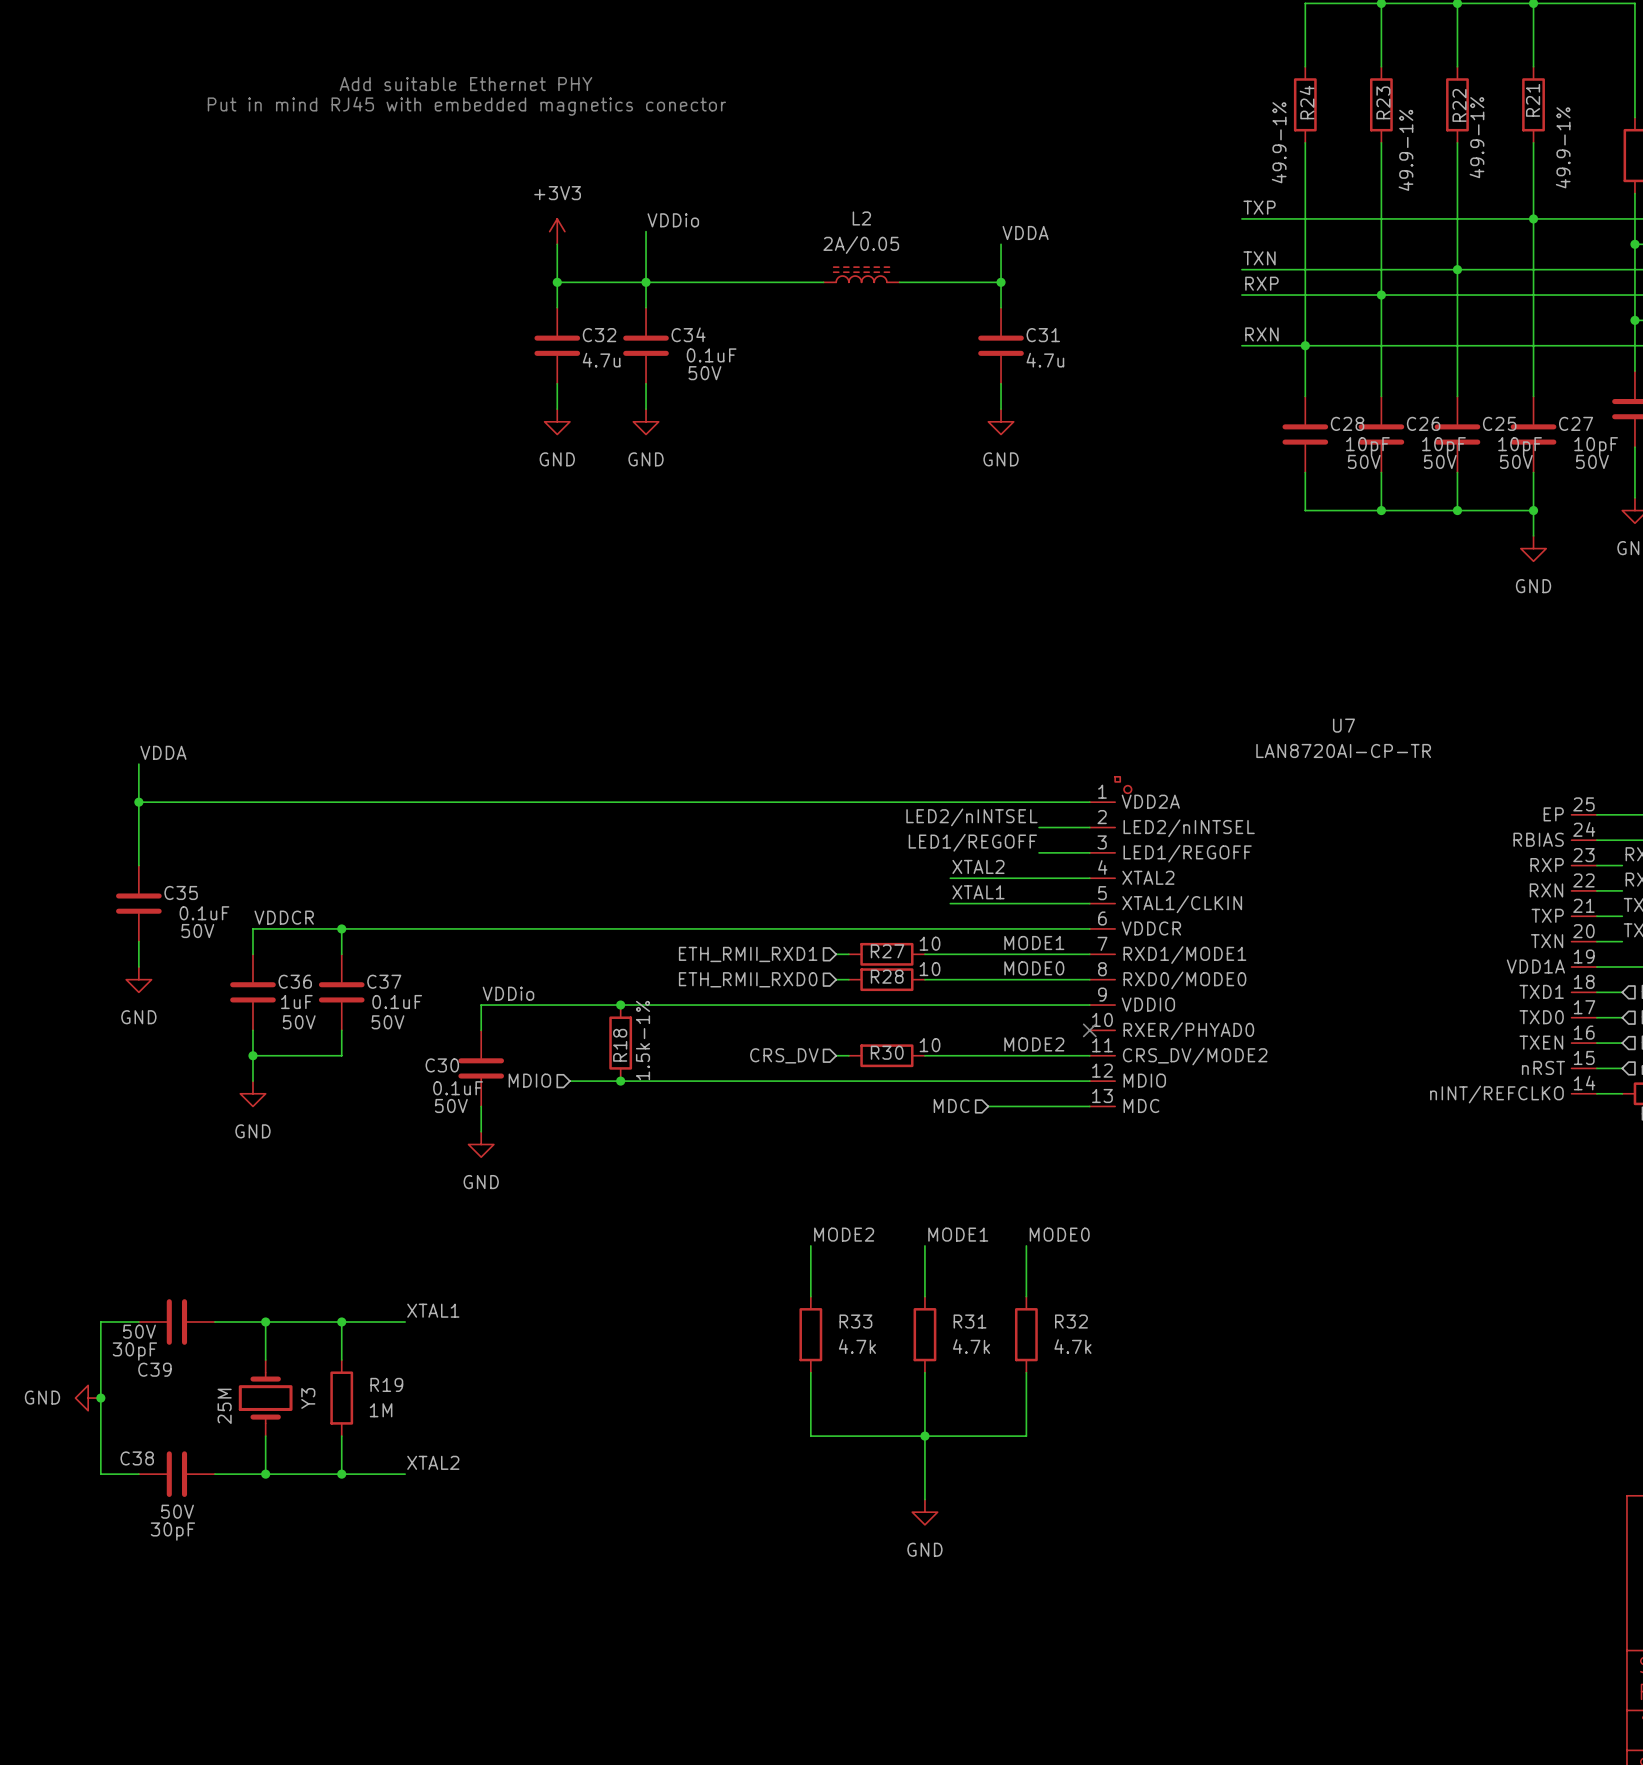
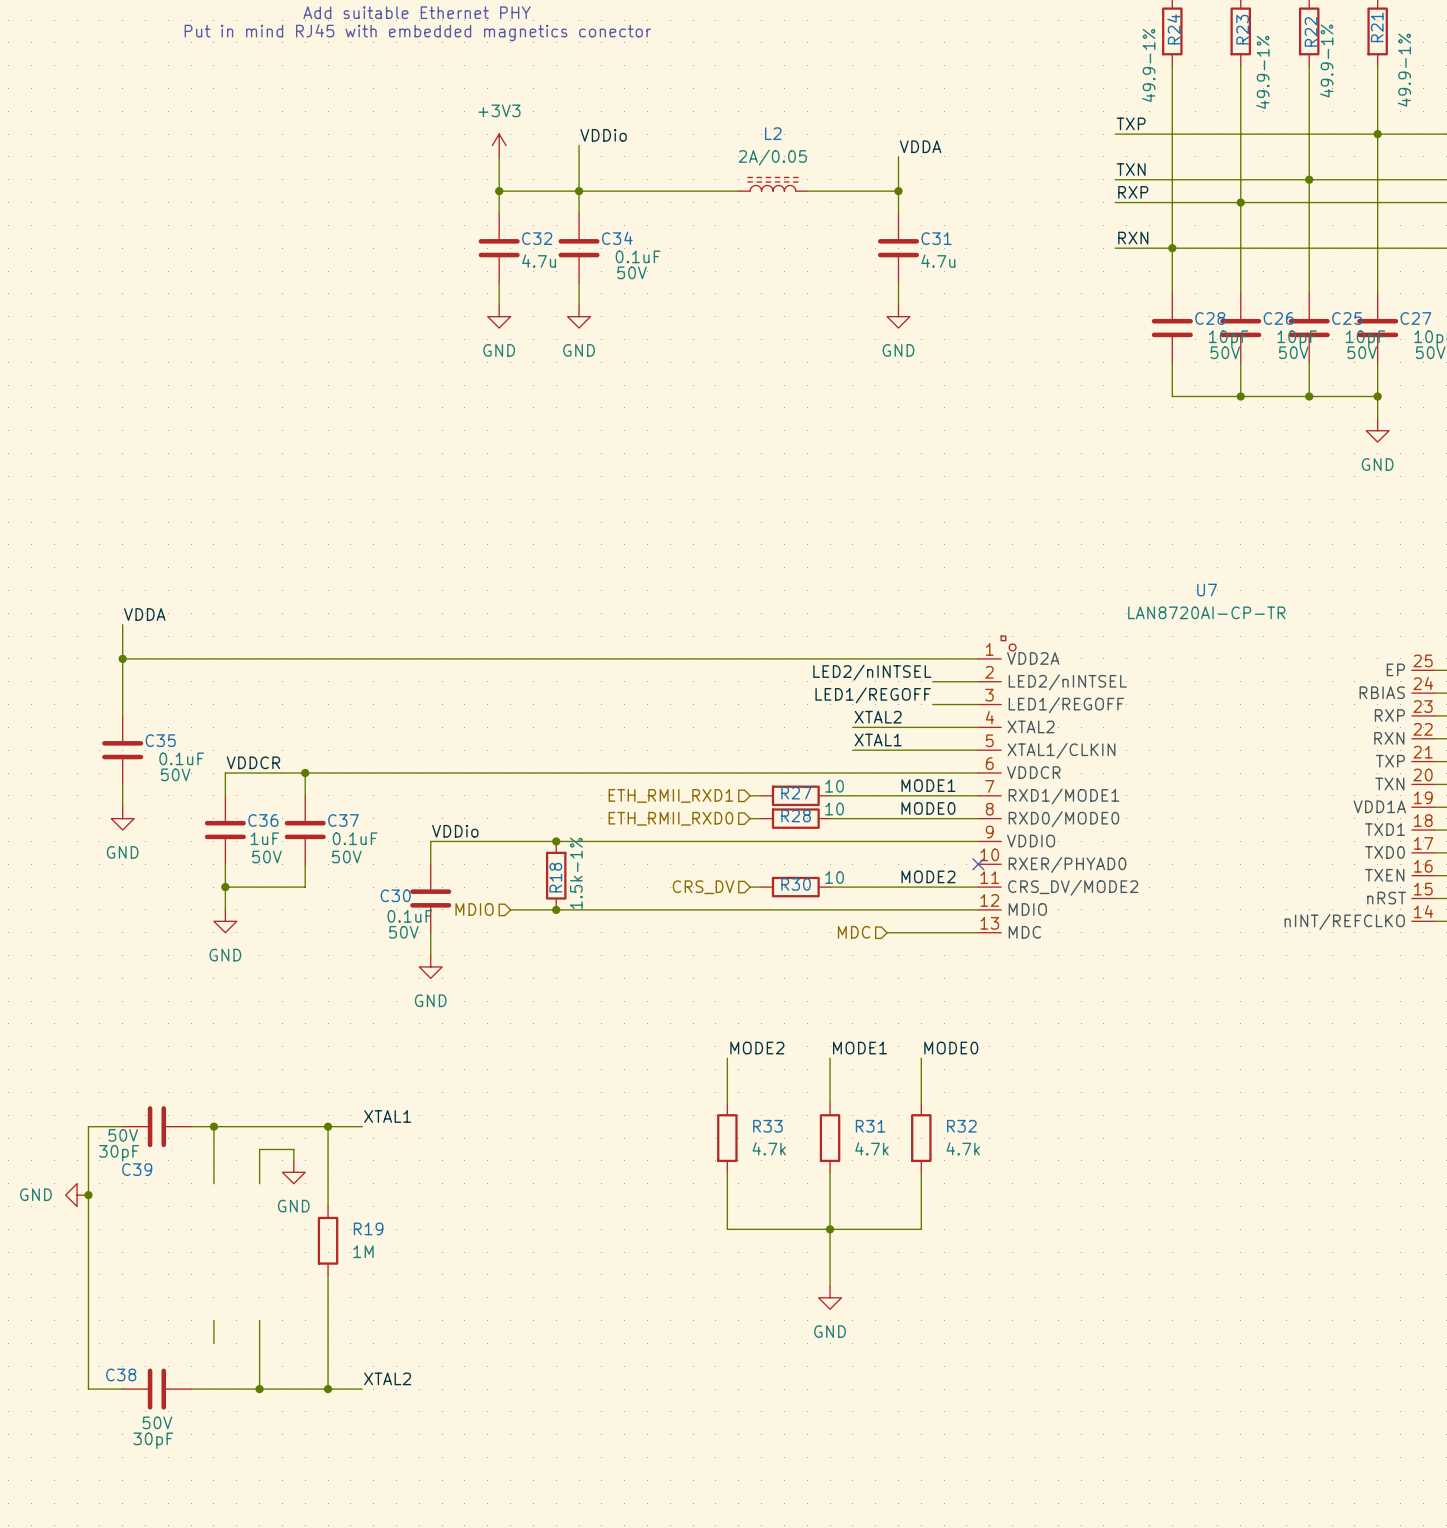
wire: none -> (213, 1126) (213, 1183)
wire: (265, 1321) (265, 1360) -> none
junction position: (265, 1321) -> (213, 1126)
wire: (341, 1321) (341, 1360) -> none
junction position: (341, 1321) -> (328, 1126)
wire: none -> (328, 1126) (328, 1206)
wire: none -> (293, 1160) (293, 1149) (259, 1149) (259, 1183)
power symbol: none -> GND (293, 1172)
Y3: 25M (265, 1398) -> none
R19 position: (341, 1398) -> (328, 1240)
wire: (265, 1436) (265, 1474) -> none
wire: (341, 1436) (341, 1474) -> none
label position: XTAL2 (433, 1462) -> XTAL2 (387, 1378)
wire: (100, 1474) (138, 1474) -> (88, 1263) (88, 1389) (122, 1389)
C38 position: (176, 1474) -> (156, 1389)
wire: (214, 1474) (405, 1474) -> (191, 1389) (362, 1389)
junction: (265, 1474) -> none
junction: (341, 1474) -> none
wire: none -> (328, 1274) (328, 1389)
wire: none -> (213, 1320) (213, 1343)
wire: none -> (259, 1320) (259, 1389)
junction: none -> (259, 1389)
junction: none -> (328, 1389)

